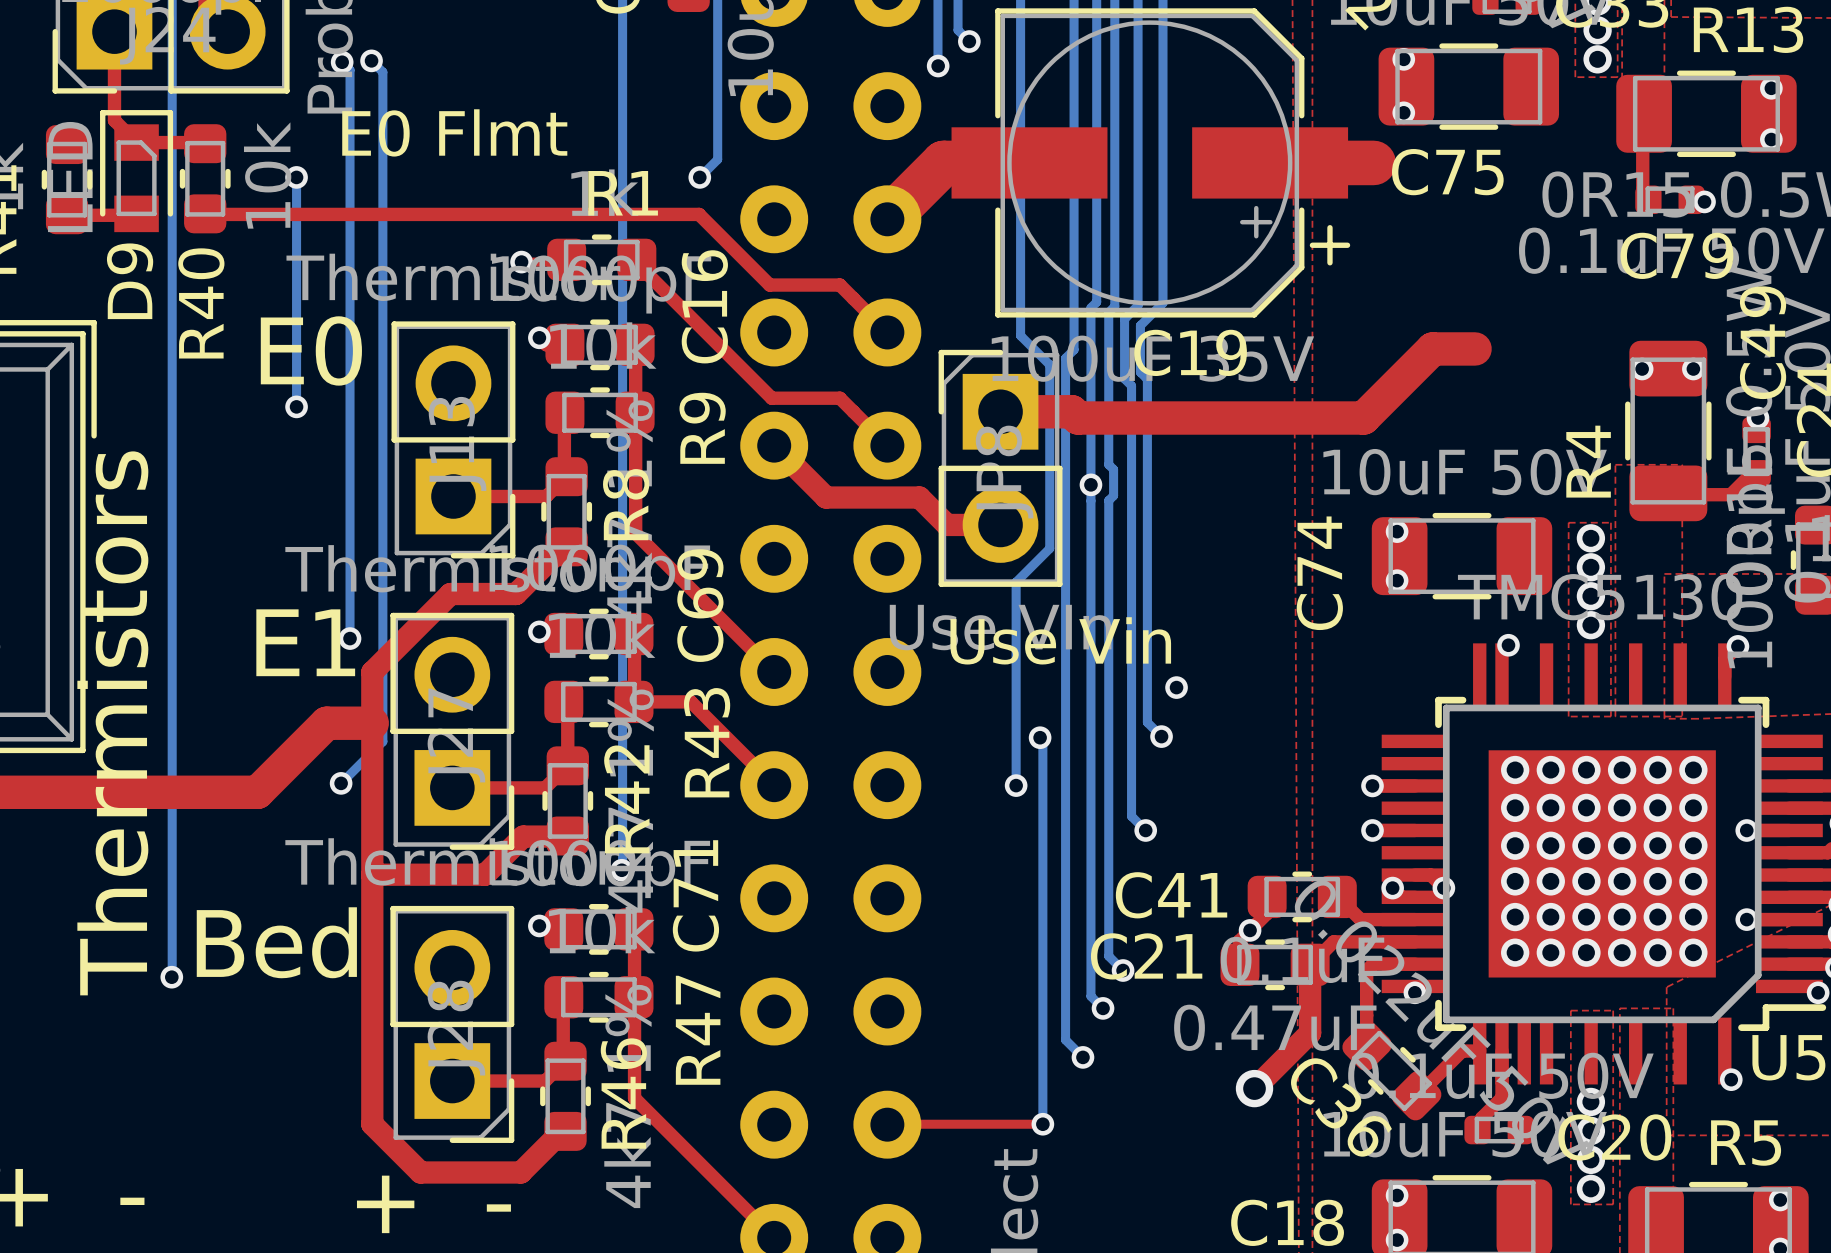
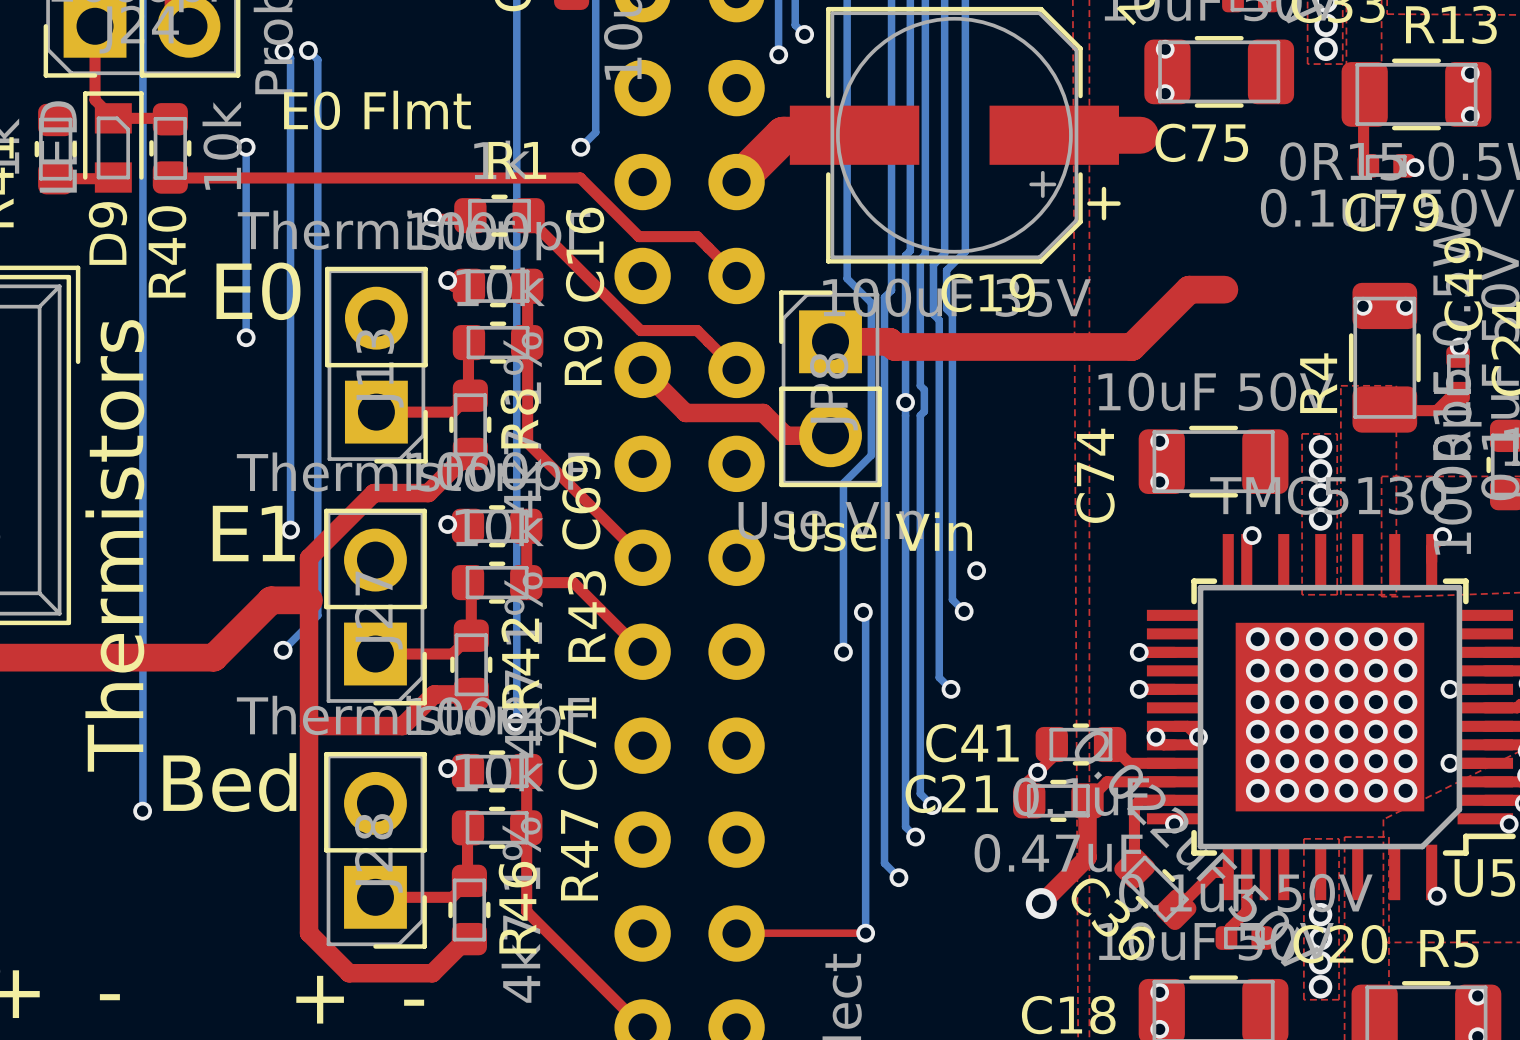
text position: Thermistors (112, 723) -> Thermistors (114, 545)

